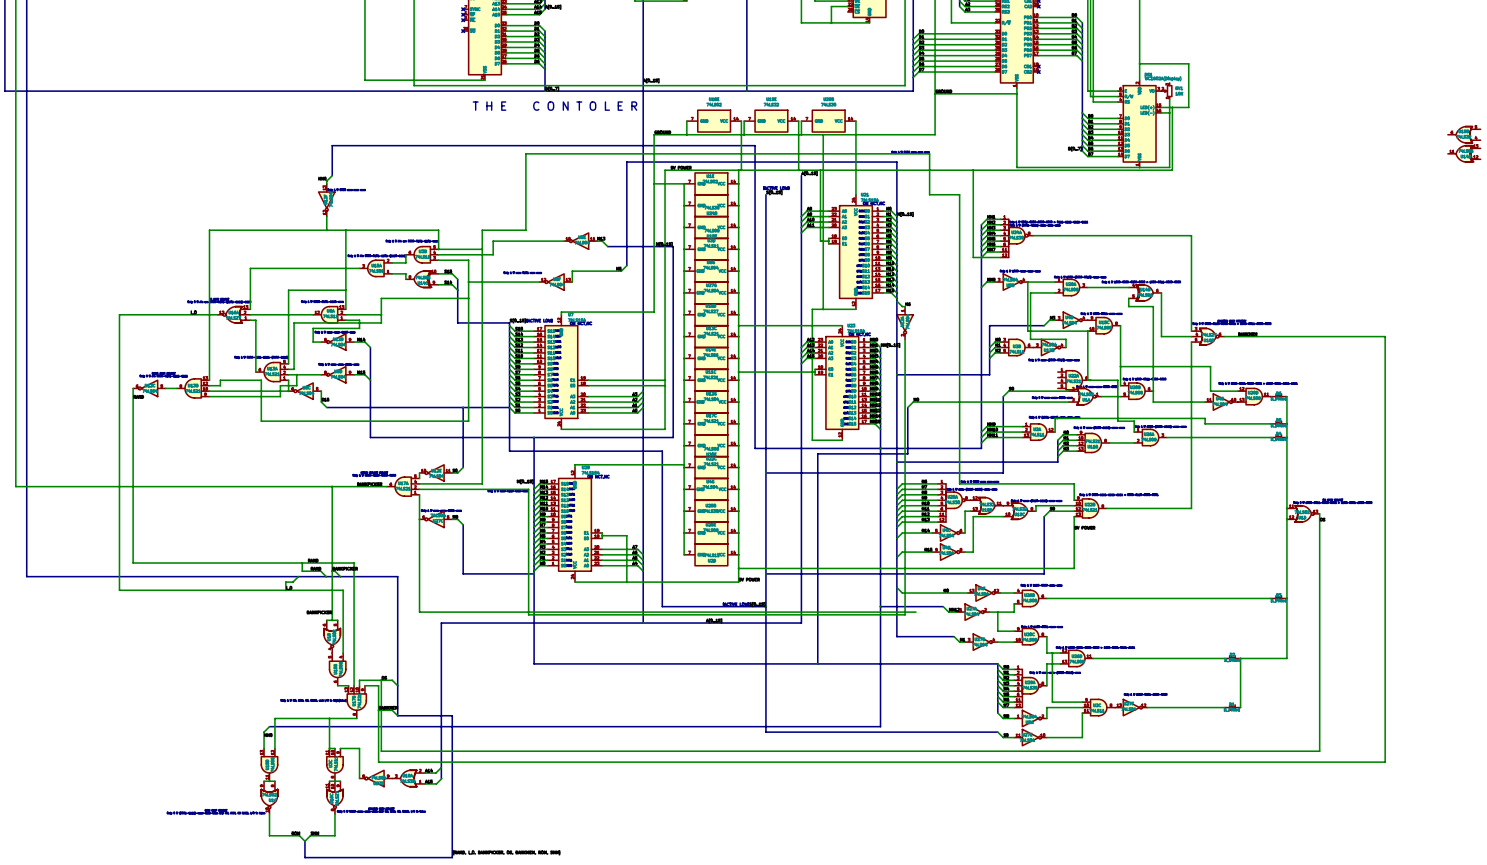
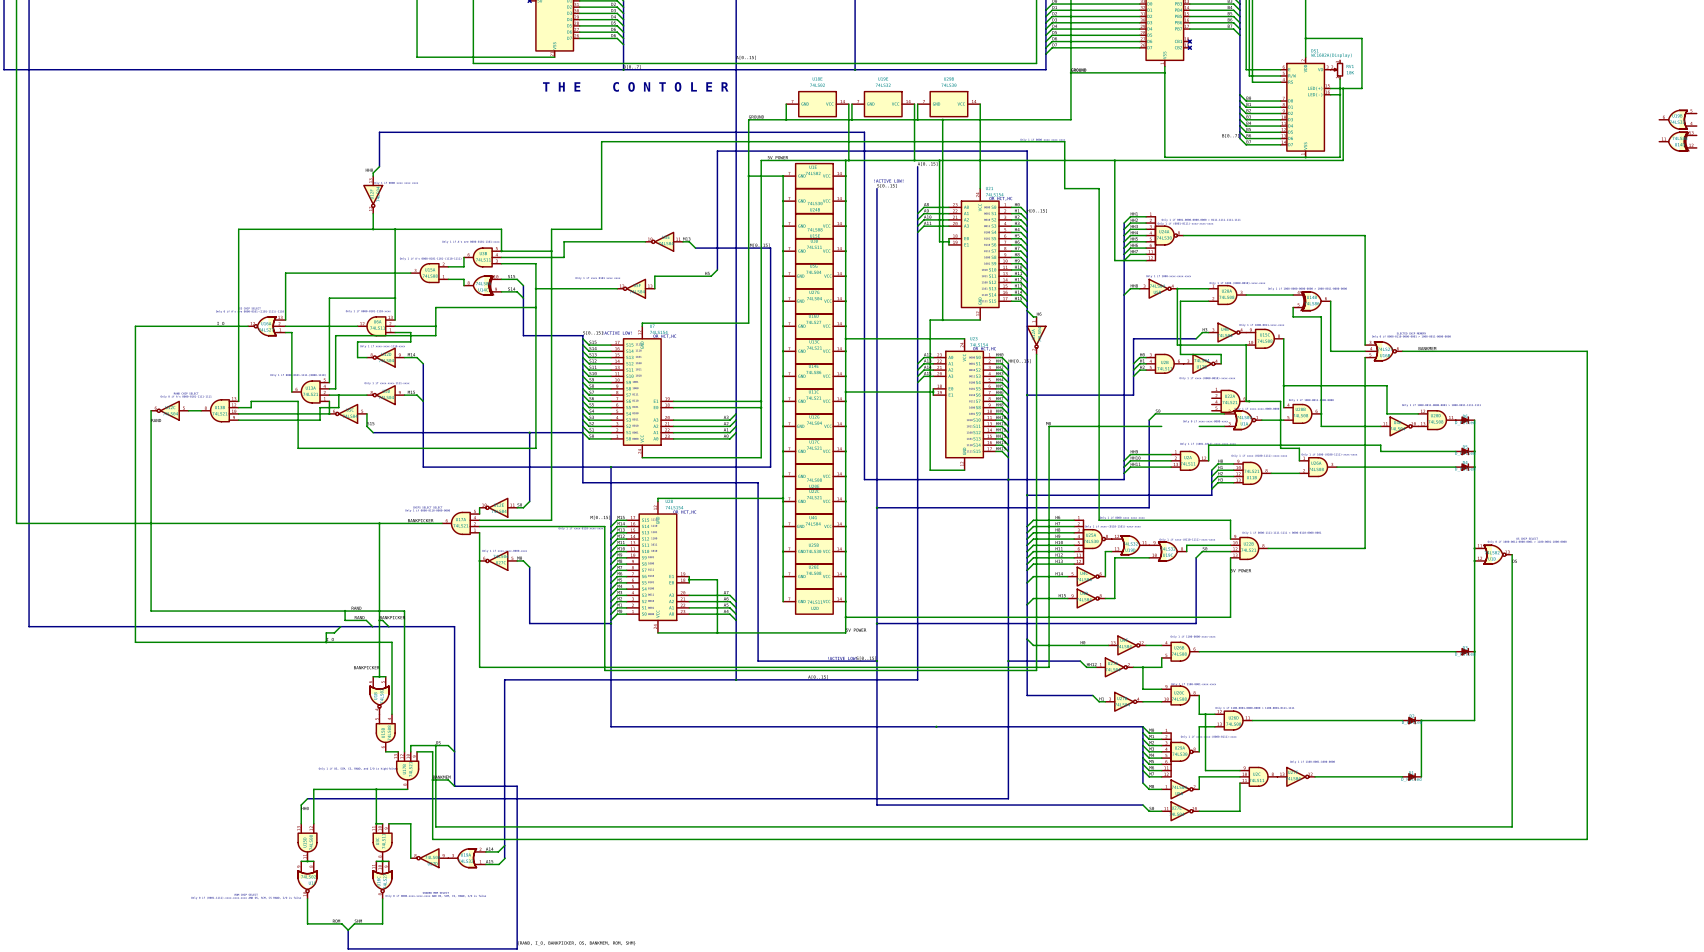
wire: (915, 402) (913, 402) (907, 407) -> (1049, 426) (1049, 667)
wire: (1014, 402) (1046, 402) -> none
bus: (907, 407) (907, 453) (817, 453) (817, 663) -> none

